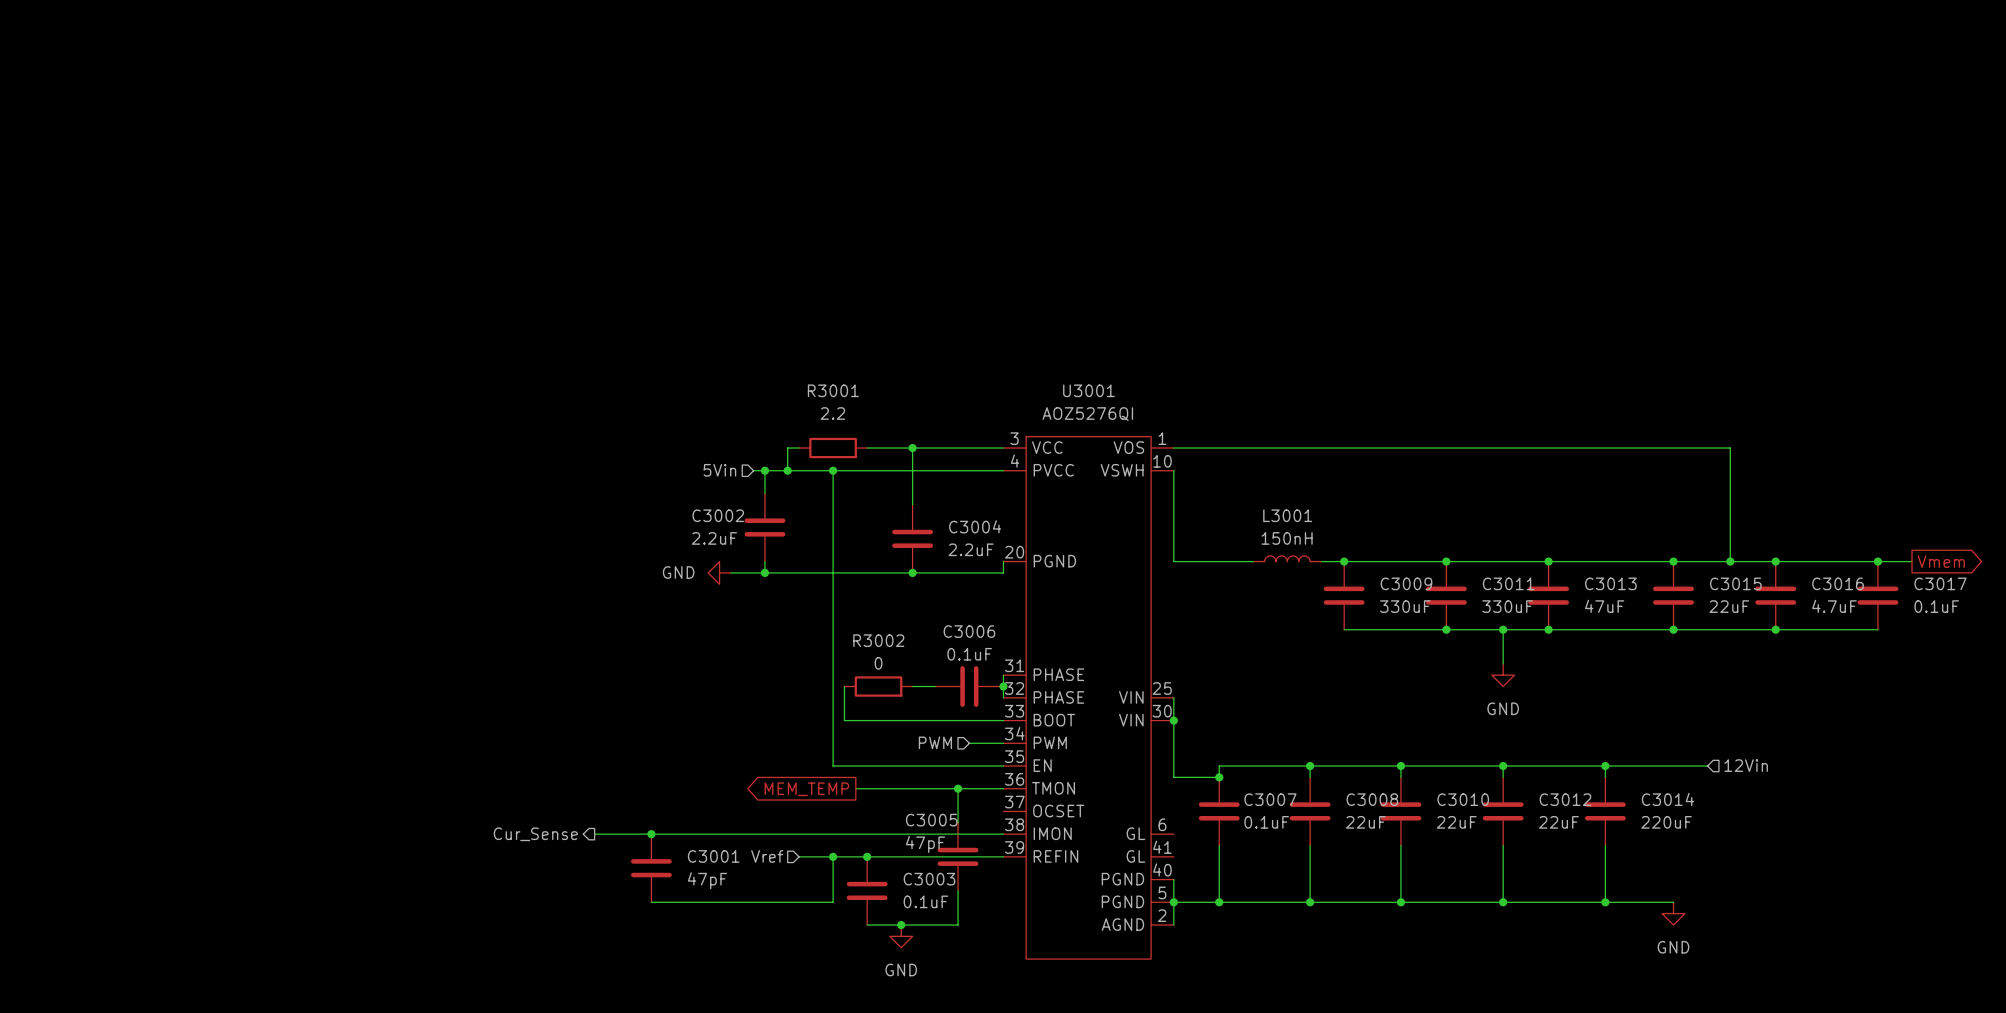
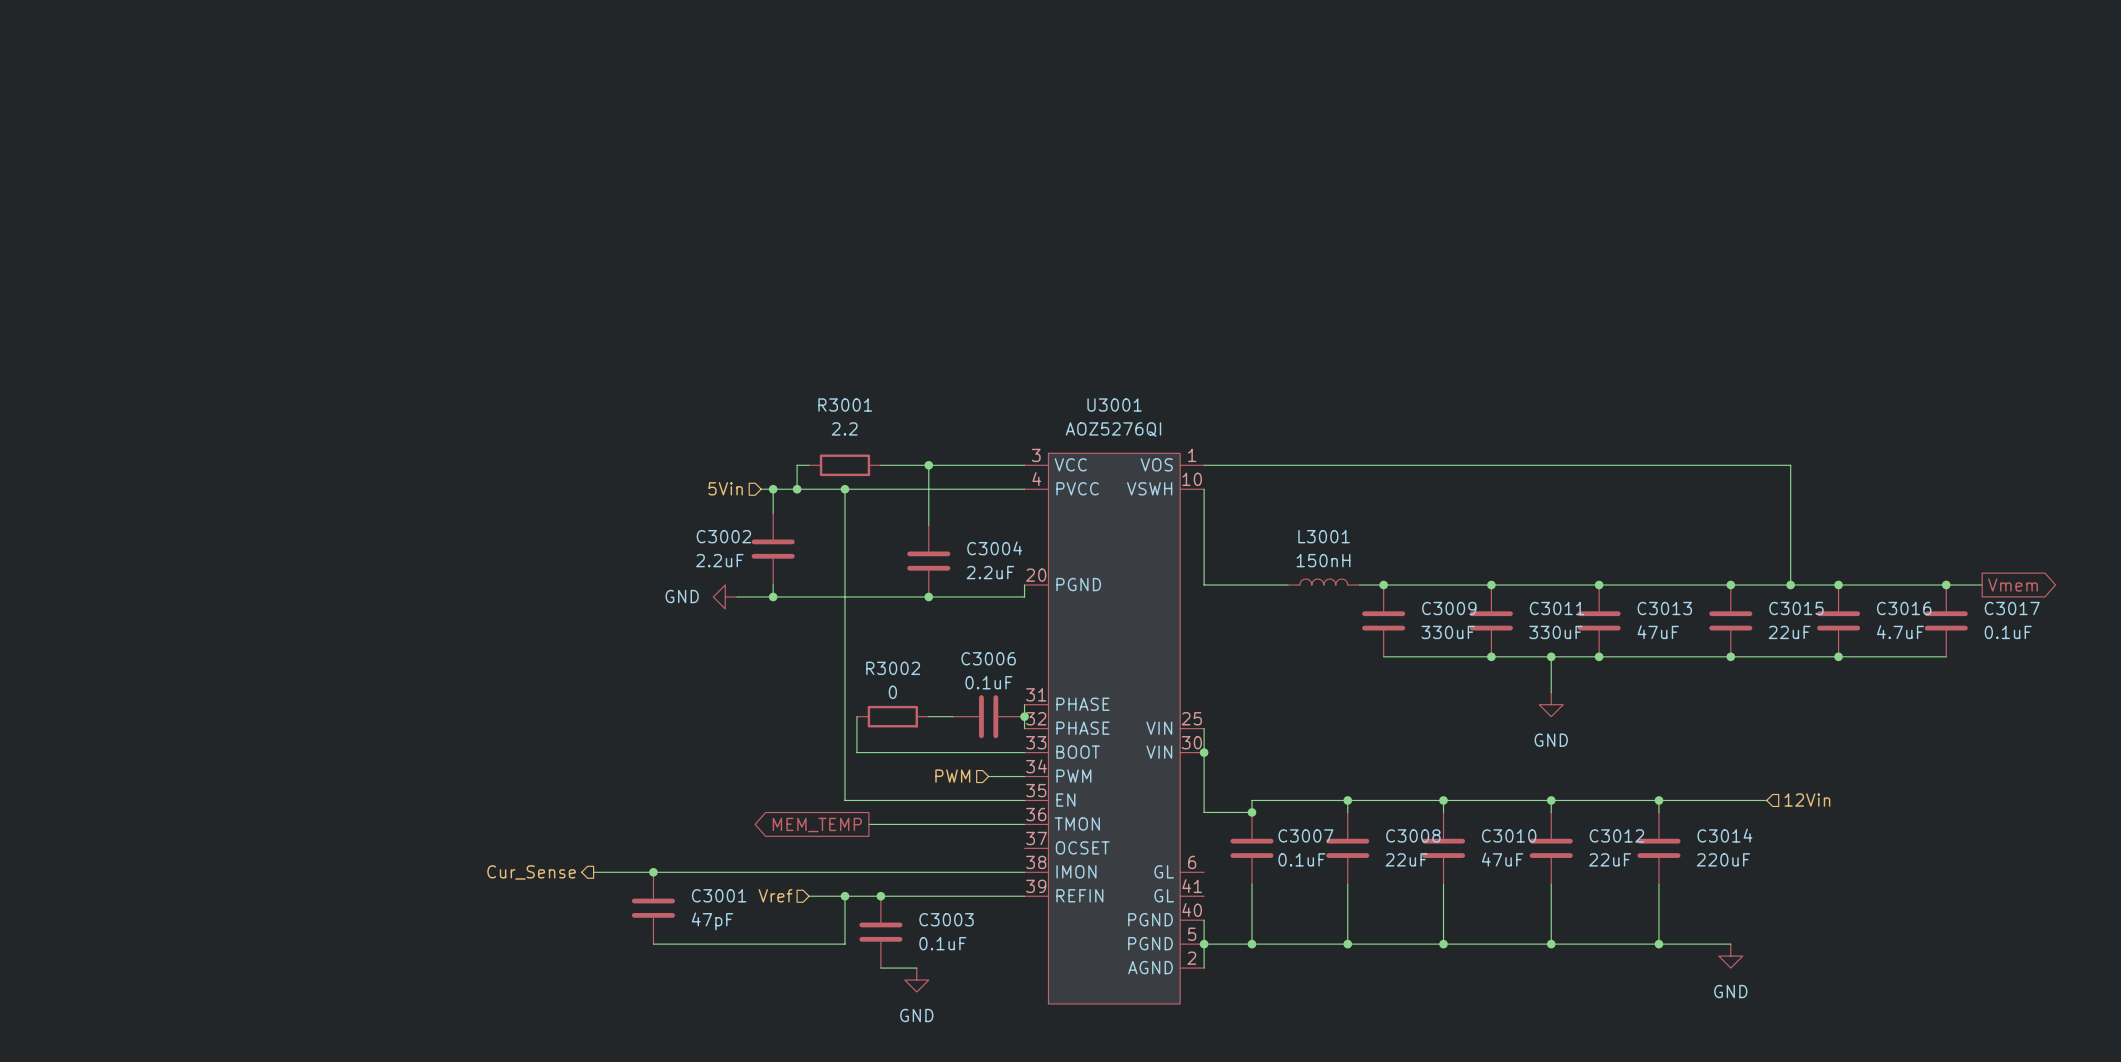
wire: (958, 788) (958, 822) -> none
junction: (958, 788) -> none
C3010 value: 22uF (1456, 822) -> 47uF (1502, 859)
C3005: 47pF (958, 856) -> none
wire: (958, 890) (958, 925) (901, 925) -> none
junction: (901, 925) -> none

